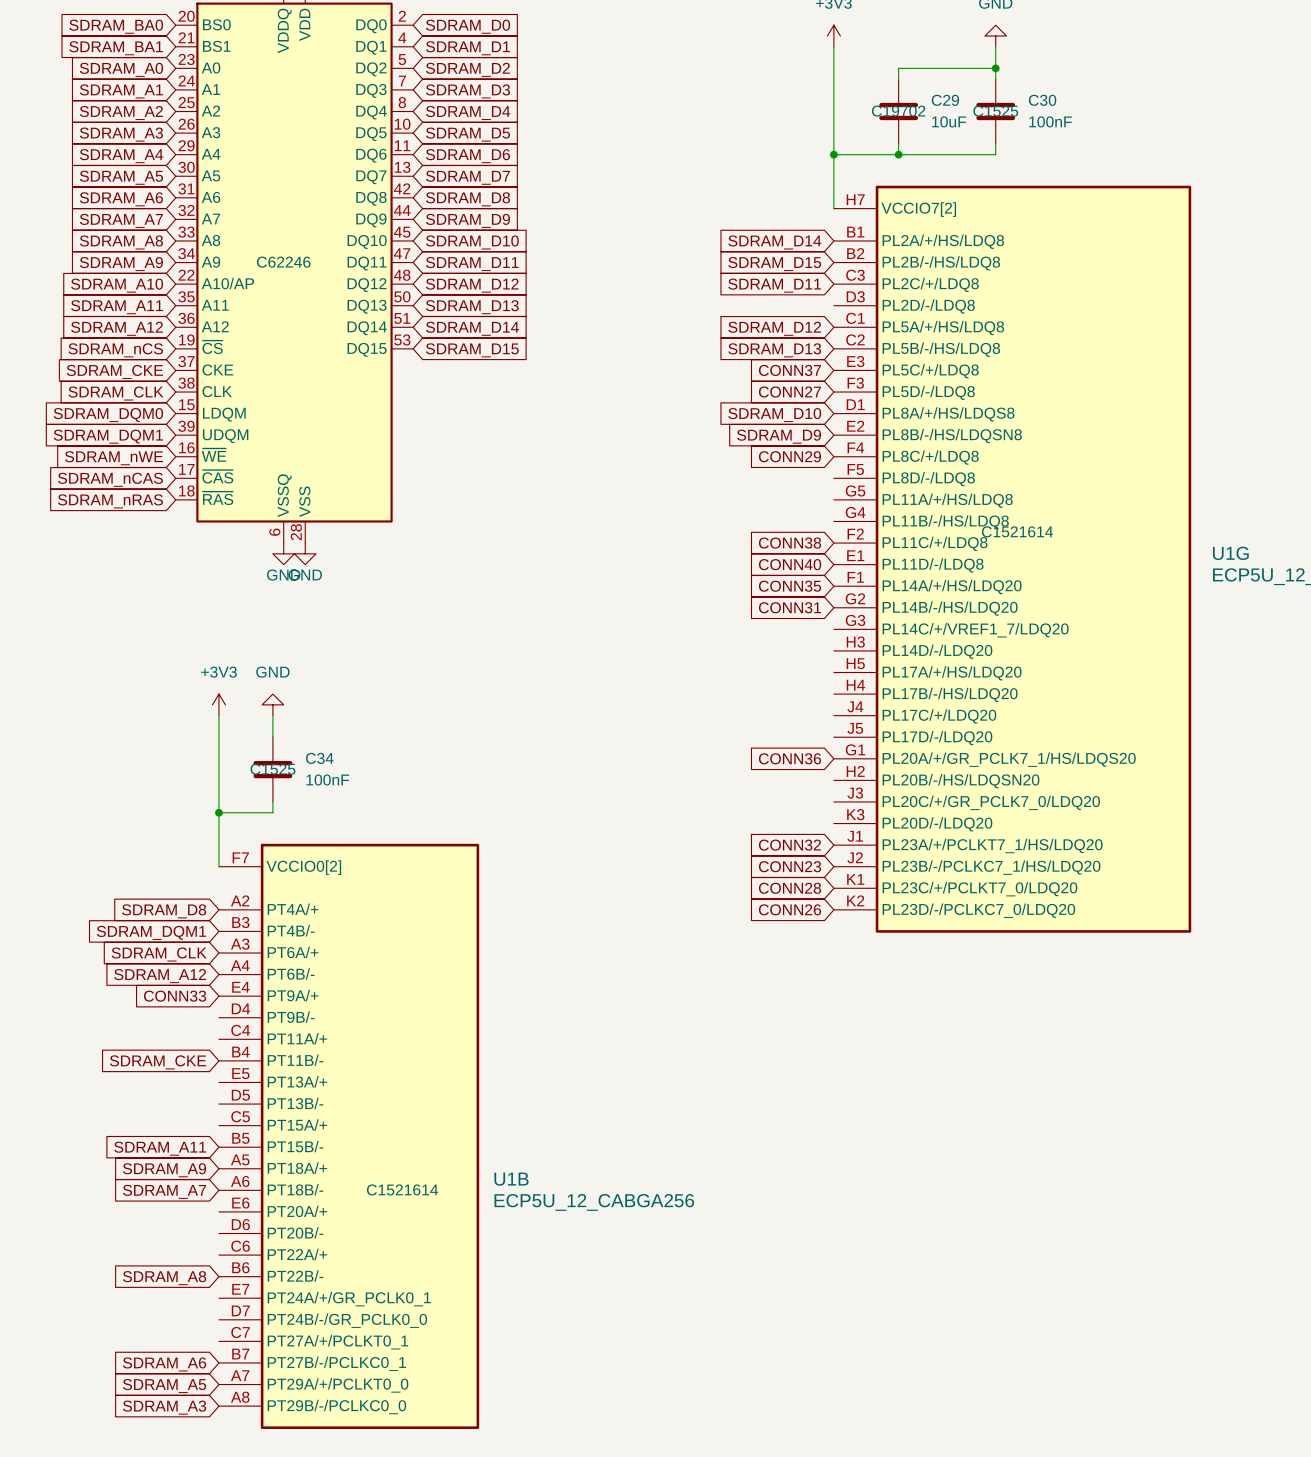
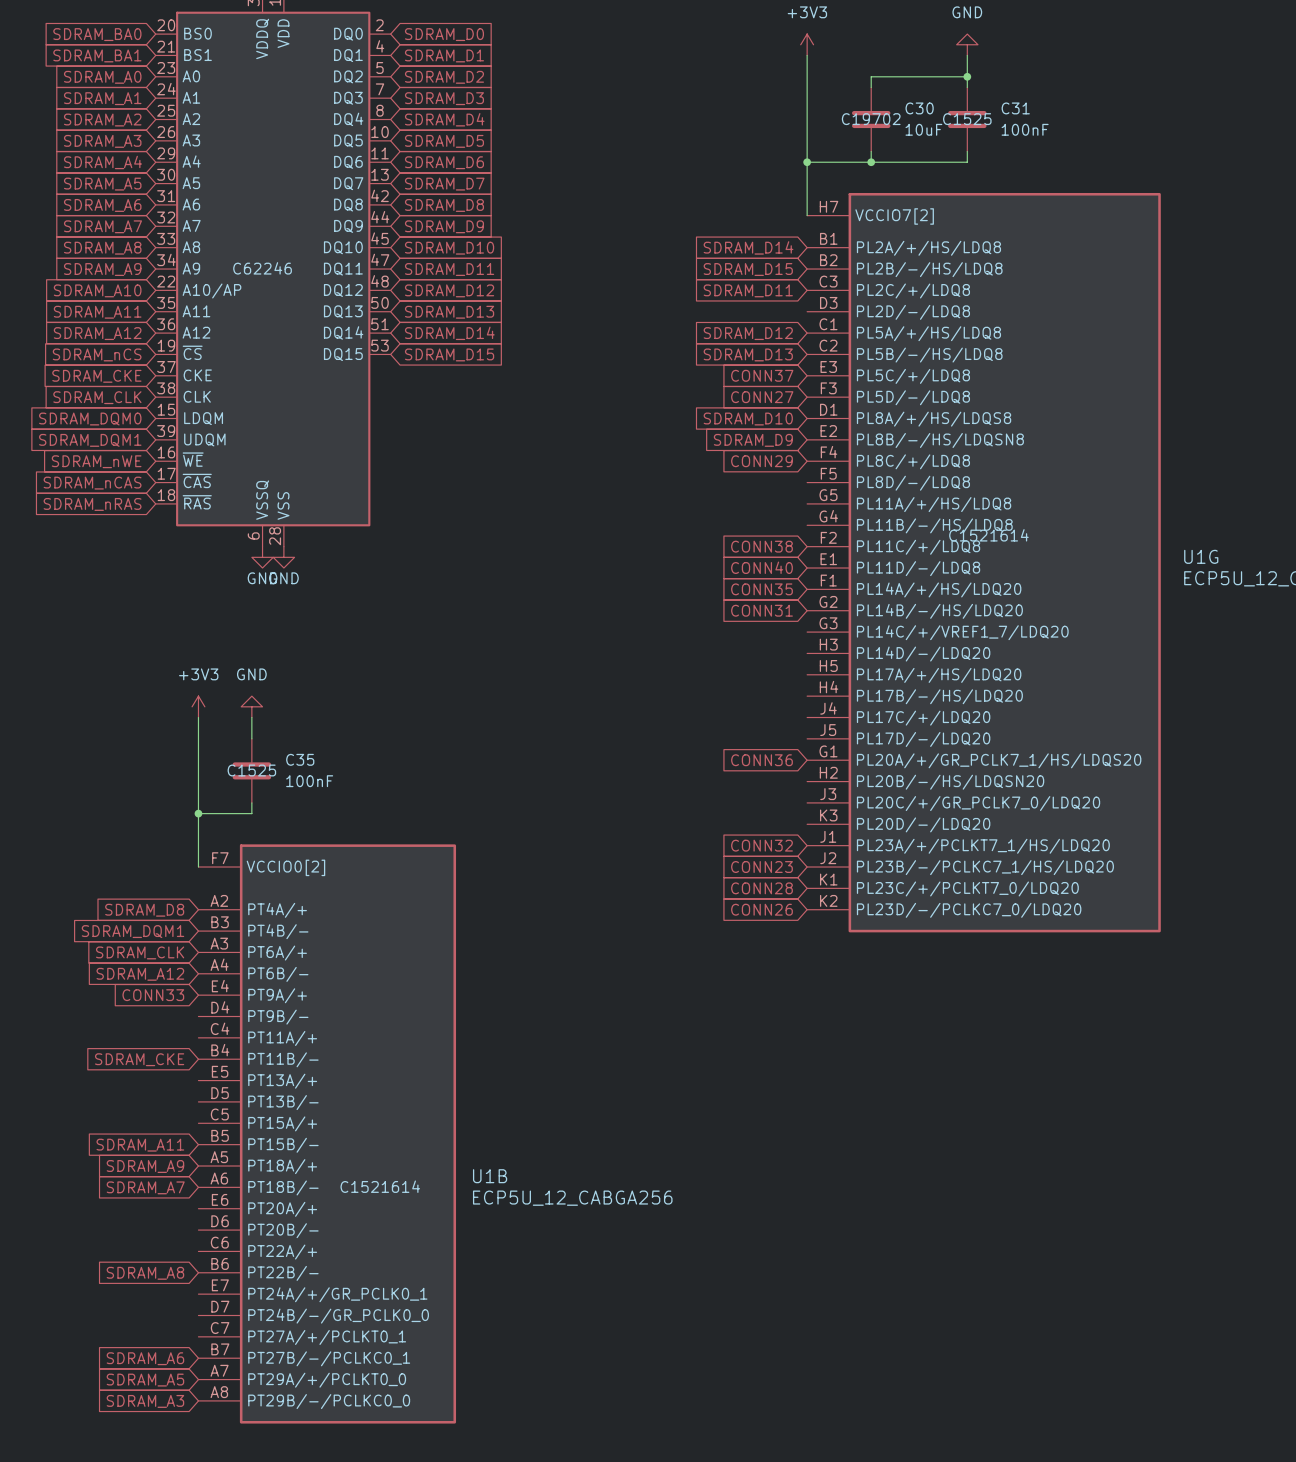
C29 name: C29 (945, 100) -> C30 (919, 108)
C30 name: C30 (1042, 100) -> C31 (1015, 108)
C34 name: C34 (319, 758) -> C35 (300, 759)

